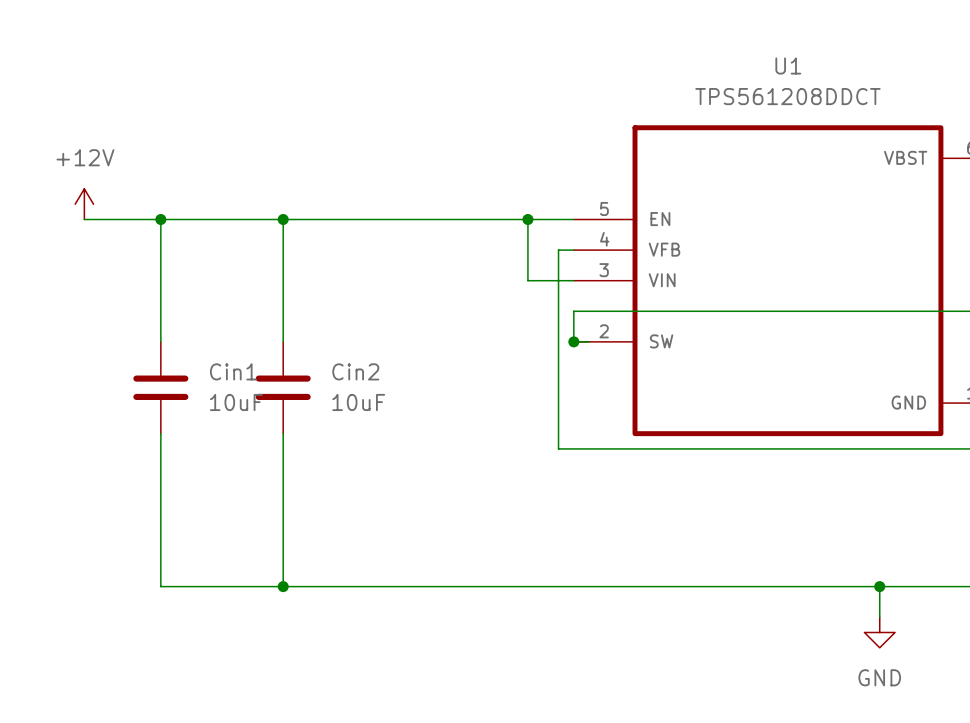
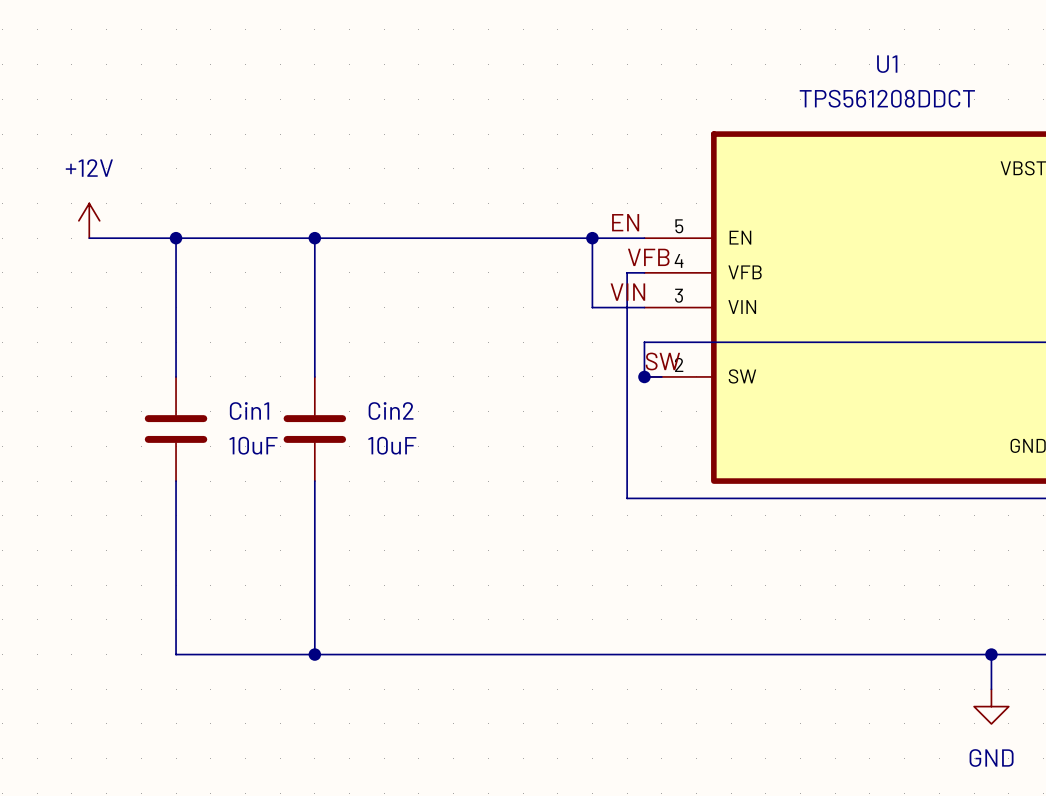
label: none -> EN (625, 222)
label: none -> VFB (648, 257)
label: none -> VIN (627, 292)
label: none -> SW (662, 361)

